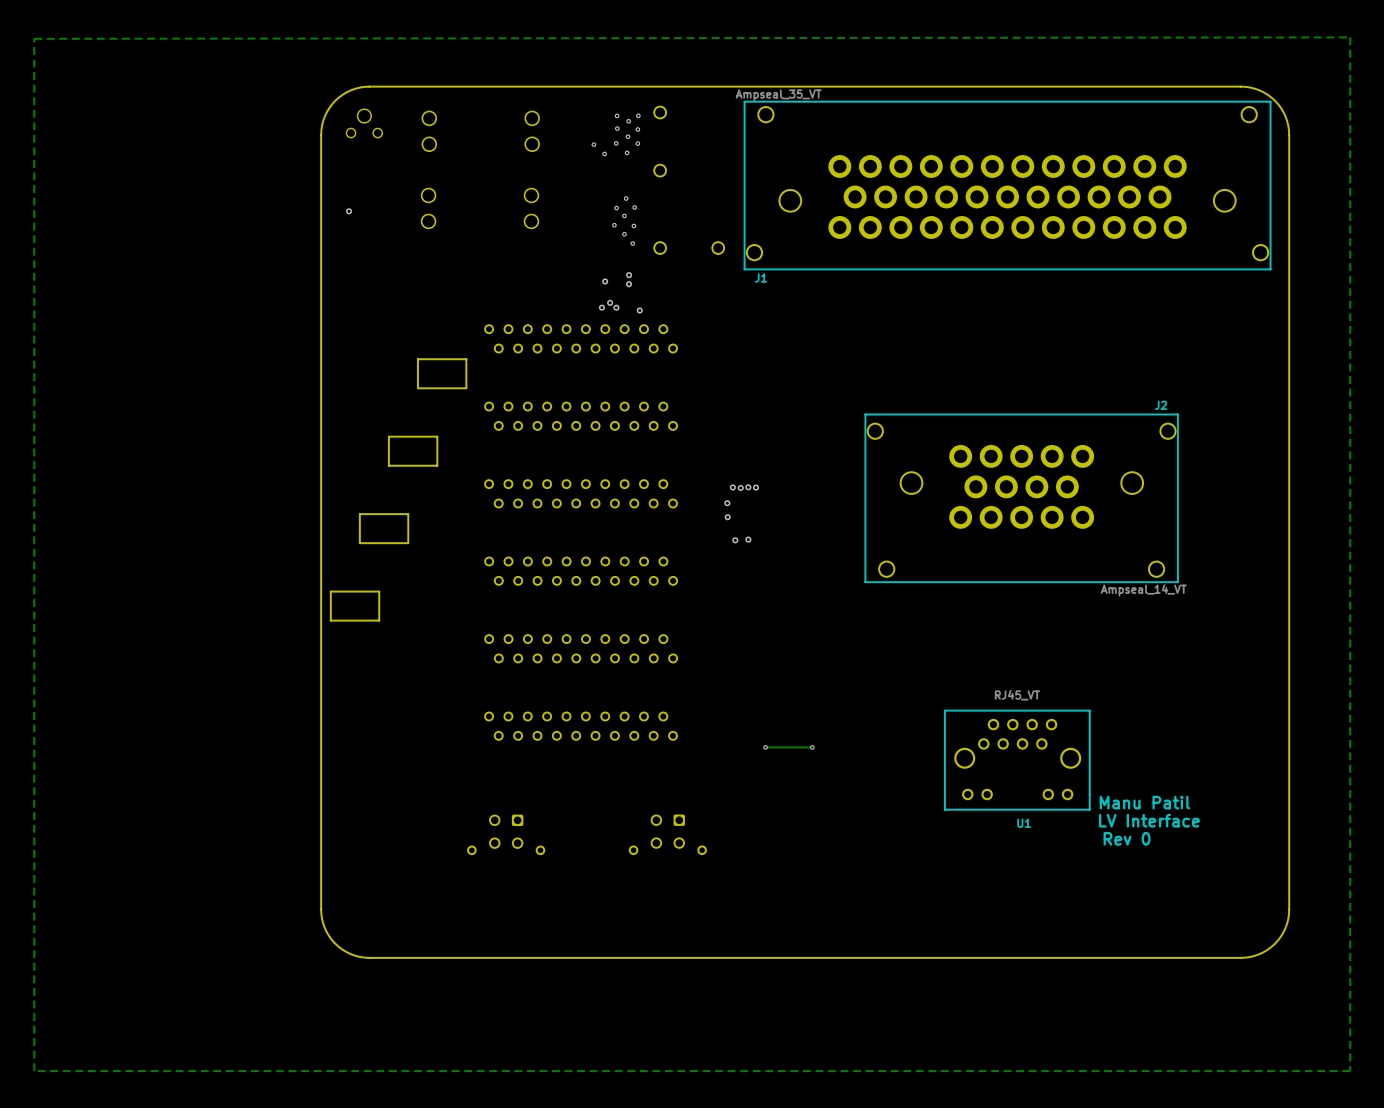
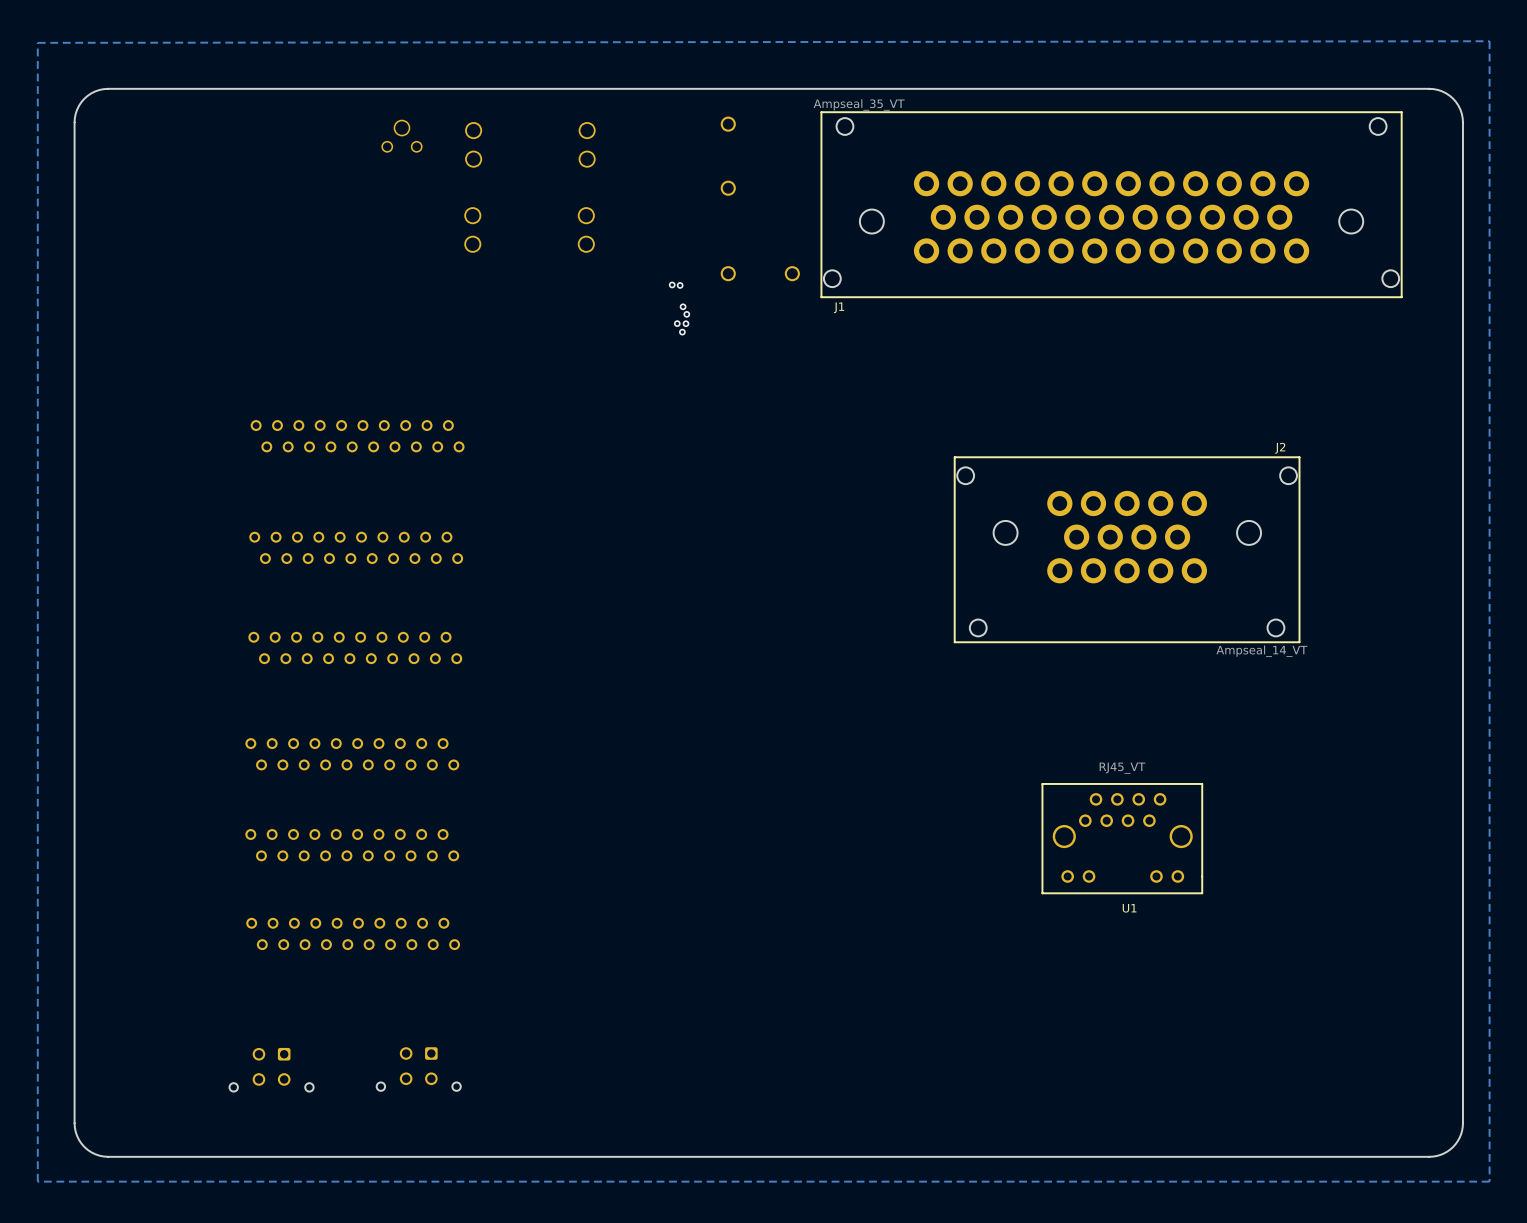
board edge: (1240, 86) (369, 86) (351, 90) (335, 100) (324, 116) (321, 135) (321, 909) (324, 928) (335, 943) (351, 954) (369, 957) (1240, 957) (1259, 954) (1275, 943) (1285, 928) (1289, 909) (1289, 135) (1285, 116) (1275, 100) (1259, 90) (1240, 86) -> (1429, 88) (1442, 91) (1453, 98) (1460, 109) (1462, 122) (1462, 1123) (1459, 1137) (1450, 1149) (1440, 1154) (1429, 1156) (108, 1156) (91, 1152) (81, 1143) (77, 1136) (74, 1123) (74, 122) (79, 105) (87, 95) (95, 91) (108, 88) (1429, 88)
via: (617, 115) -> none
via: (638, 115) -> none
via: (628, 121) -> none
via: (617, 128) -> none
via: (637, 129) -> none
via: (627, 136) -> none
via: (616, 143) -> none
via: (637, 143) -> none
via: (593, 144) -> none
via: (627, 152) -> none
via: (604, 153) -> none
via: (626, 198) -> none
via: (634, 207) -> none
via: (616, 208) -> none
via: (349, 211) -> none
via: (624, 215) -> none
via: (614, 225) -> none
via: (633, 226) -> none
via: (624, 234) -> none
via: (632, 243) -> none
via: none -> (672, 284)
via: none -> (680, 285)
via: (629, 275) -> none
via: none -> (683, 306)
via: (605, 281) -> none
via: none -> (686, 314)
via: (628, 284) -> none
via: none -> (677, 323)
via: none -> (685, 323)
via: none -> (682, 332)
via: (610, 302) -> none
via: (601, 307) -> none
via: (616, 307) -> none
via: (639, 310) -> none
part: (581, 338) -> none
board edge: (466, 359) (417, 359) (417, 388) (466, 388) (466, 359) -> none
part: none -> (357, 436)
part: (581, 416) -> none
board edge: (437, 436) (437, 465) (388, 465) (388, 436) (437, 436) -> none
via: (732, 487) -> none
via: (740, 487) -> none
via: (748, 487) -> none
via: (755, 487) -> none
part: (581, 493) -> none
part: none -> (356, 547)
via: (727, 503) -> none
board edge: (408, 514) (408, 543) (359, 543) (359, 514) (408, 514) -> none
via: (727, 517) -> none
via: (748, 539) -> none
via: (735, 540) -> none
part: (581, 571) -> none
part: none -> (355, 647)
board edge: (379, 591) (379, 620) (330, 620) (330, 591) (379, 591) -> none
part: (581, 648) -> none
part: none -> (352, 754)
part: (581, 726) -> none
via: (765, 747) -> none
track: (812, 747) (765, 747) -> none
via: (812, 747) -> none
part: none -> (352, 845)
text: Manu Patil (1144, 802) -> none
text: LV Interface (1149, 820) -> none
part: (506, 834) -> none
part: (667, 834) -> none
text: Rev 0 (1127, 838) -> none
part: none -> (353, 933)
part: none -> (271, 1069)
part: none -> (418, 1069)

